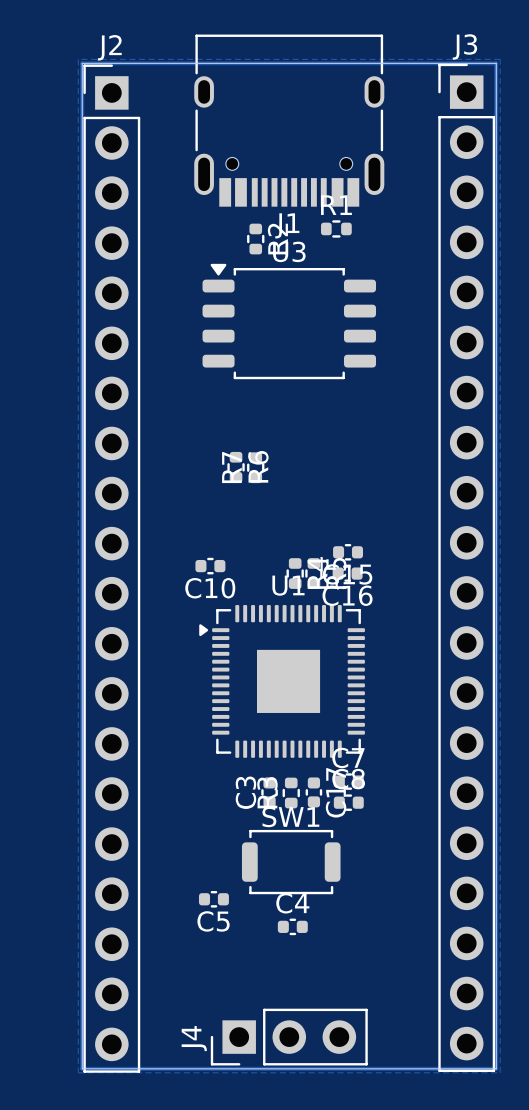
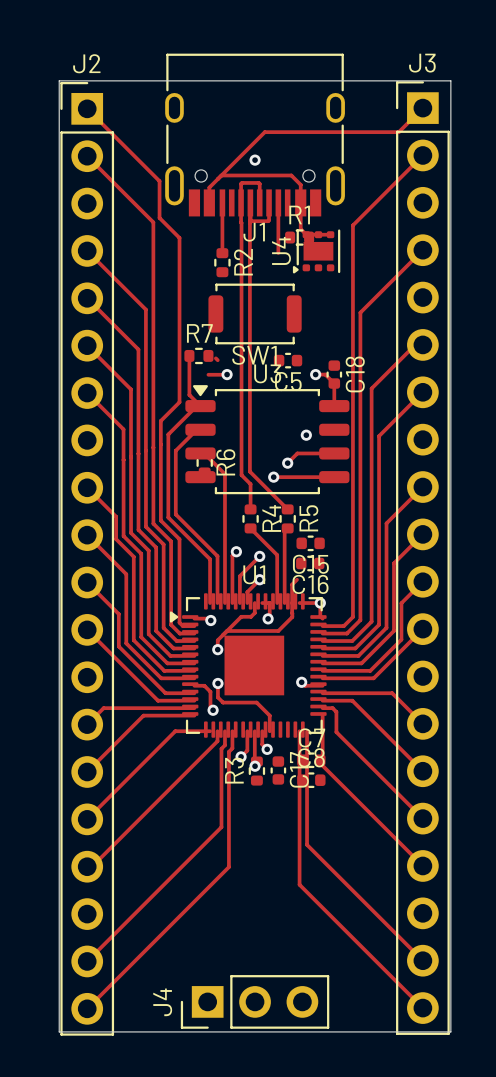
zone outline: (78, 59) (78, 1072) (500, 1072) (500, 59) (78, 59) -> none
track: (82, 63) (496, 63) (496, 1068) (82, 1068) (82, 63) -> none
track: none -> (87, 108) (159, 181) (159, 217) (179, 237) (179, 402) (160, 420) (160, 520) (179, 539) (179, 622) (182, 626) (194, 626)
track: none -> (422, 108) (398, 132) (264, 132) (209, 187) (209, 202)
track: none -> (422, 155) (352, 225) (352, 617) (343, 626) (322, 626)
track: none -> (87, 156) (153, 222) (153, 523) (171, 541) (171, 624) (179, 633) (194, 633)
via: none -> (255, 160)
track: none -> (221, 175) (291, 175) (300, 184) (300, 229) (306, 234) (330, 234)
track: none -> (222, 202) (222, 253)
track: none -> (250, 202) (249, 471) (287, 509)
track: none -> (259, 202) (259, 183) (241, 182) (241, 475) (250, 484) (250, 509)
track: none -> (269, 202) (268, 221) (250, 220)
track: none -> (278, 202) (278, 252)
R2 position: (255, 239) -> (222, 262)
track: none -> (422, 250) (360, 312) (360, 620) (346, 633) (322, 633)
track: none -> (87, 250) (145, 309) (145, 526) (163, 544) (163, 627) (176, 641) (194, 641)
U4: none -> (316, 251)
track: none -> (87, 298) (138, 349) (138, 529) (156, 547) (156, 631) (173, 648) (194, 648)
U3 position: (289, 321) -> (267, 439)
track: none -> (422, 344) (415, 344) (371, 388) (371, 621) (352, 641) (322, 641)
track: none -> (87, 345) (131, 389) (131, 532) (148, 550) (148, 634) (170, 655) (194, 655)
track: none -> (189, 355) (189, 395) (200, 406) (196, 406) (168, 434) (168, 517) (210, 559) (210, 603)
track: none -> (215, 358) (217, 360)
via: none -> (227, 374)
track: none -> (315, 374) (325, 374) (334, 383) (334, 406)
via: none -> (315, 374)
C18: none -> (334, 374)
track: none -> (208, 374) (226, 374)
track: none -> (422, 392) (379, 436) (379, 624) (355, 648) (322, 648)
track: none -> (87, 393) (123, 429) (123, 536) (141, 553) (141, 637) (167, 663) (194, 663)
track: none -> (200, 429) (196, 429) (175, 450) (175, 514) (217, 556) (217, 603)
via: none -> (306, 435)
track: none -> (200, 453) (204, 453) (224, 474) (224, 603)
track: none -> (334, 453) (297, 453) (287, 463)
R7 rotation: 0° (255, 467) -> 90° clockwise (198, 355)
R7 position: (255, 467) -> (198, 355)
via: none -> (287, 463)
track: none -> (273, 477) (334, 477)
via: none -> (273, 477)
track: none -> (422, 487) (386, 523) (386, 627) (358, 655) (322, 655)
track: none -> (87, 487) (116, 516) (116, 539) (133, 556) (133, 640) (164, 670) (194, 670)
track: none -> (250, 528) (277, 555) (277, 603)
track: none -> (287, 528) (284, 531) (284, 603)
track: none -> (422, 534) (393, 563) (393, 630) (361, 663) (322, 663)
track: none -> (87, 535) (126, 574) (126, 643) (161, 678) (194, 678)
track: none -> (236, 551) (232, 555) (232, 603)
via: none -> (236, 551)
C10: (210, 566) -> none
track: none -> (259, 556) (239, 576) (239, 603)
via: none -> (259, 556)
R4 position: (295, 573) -> (250, 518)
R5 position: (313, 573) -> (287, 518)
track: none -> (259, 579) (247, 592) (247, 603)
via: none -> (259, 579)
track: none -> (297, 579) (292, 584) (292, 613)
track: none -> (422, 581) (401, 603) (401, 639) (370, 670) (322, 670)
track: none -> (87, 582) (118, 614) (118, 646) (165, 693) (194, 693)
track: none -> (254, 603) (254, 613) (251, 616) (241, 616) (217, 640) (217, 649)
track: none -> (262, 603) (269, 603) (268, 618)
track: none -> (299, 603) (320, 603) (320, 616) (322, 618)
via: none -> (320, 603)
track: none -> (292, 613) (292, 617) (278, 631) (227, 631)
track: none -> (194, 618) (208, 618) (210, 620)
via: none -> (268, 618)
via: none -> (210, 620)
track: none -> (422, 629) (373, 678) (322, 678)
track: none -> (87, 629) (158, 700) (194, 700)
via: none -> (217, 649)
track: none -> (301, 682) (305, 685) (322, 685)
via: none -> (301, 682)
track: none -> (217, 683) (217, 697) (223, 702) (256, 702) (269, 715) (269, 731)
via: none -> (217, 683)
track: none -> (194, 685) (204, 685) (210, 691) (210, 707) (213, 710)
track: none -> (322, 693) (392, 693) (422, 723)
track: none -> (322, 700) (352, 700) (422, 771)
track: none -> (194, 708) (103, 708) (87, 724)
track: none -> (322, 708) (332, 708) (336, 711) (336, 732) (422, 818)
via: none -> (213, 710)
track: none -> (194, 715) (143, 715) (87, 771)
track: none -> (322, 715) (322, 765) (422, 865)
track: none -> (210, 731) (175, 731) (87, 819)
track: none -> (217, 731) (217, 741) (92, 866) (87, 866)
track: none -> (224, 731) (224, 745) (221, 748) (221, 827) (87, 961)
track: none -> (232, 731) (232, 748) (228, 751) (228, 867) (87, 1008)
track: none -> (247, 731) (247, 750) (241, 756)
track: none -> (254, 731) (254, 765)
track: none -> (262, 731) (262, 744) (267, 749)
track: none -> (299, 731) (299, 884) (422, 1008)
track: none -> (307, 731) (307, 844) (422, 960)
via: none -> (267, 749)
via: none -> (241, 756)
via: none -> (255, 766)
C3: (269, 792) -> none
SW1 name position: SW1 (290, 816) -> SW1 (254, 355)
SW1 position: (291, 862) -> (255, 313)
C5 position: (213, 899) -> (288, 360)
C4: (292, 926) -> none

